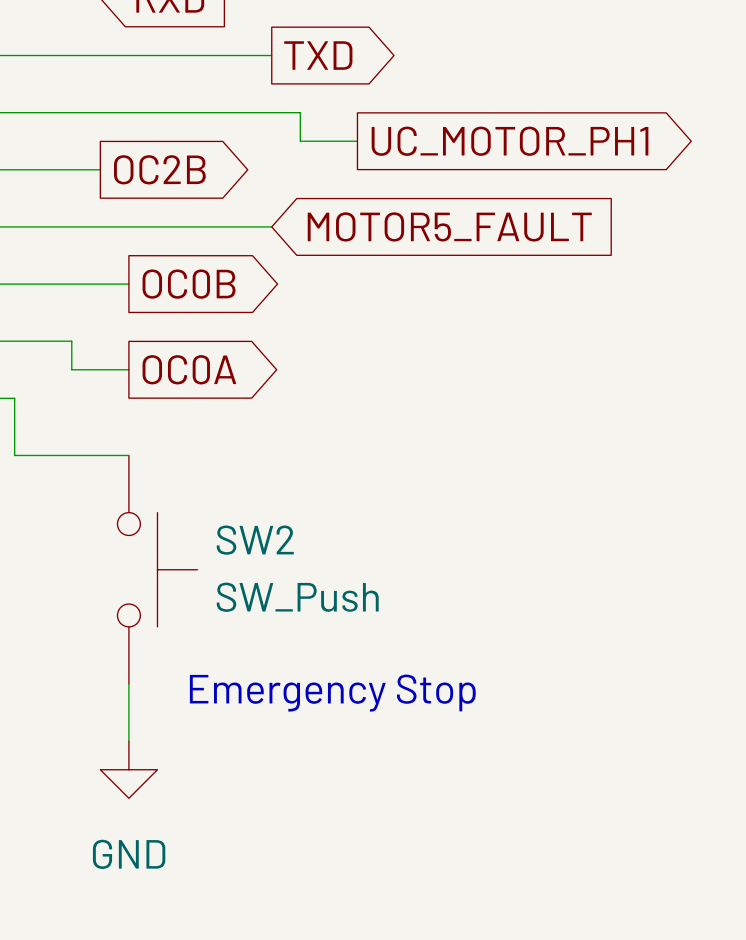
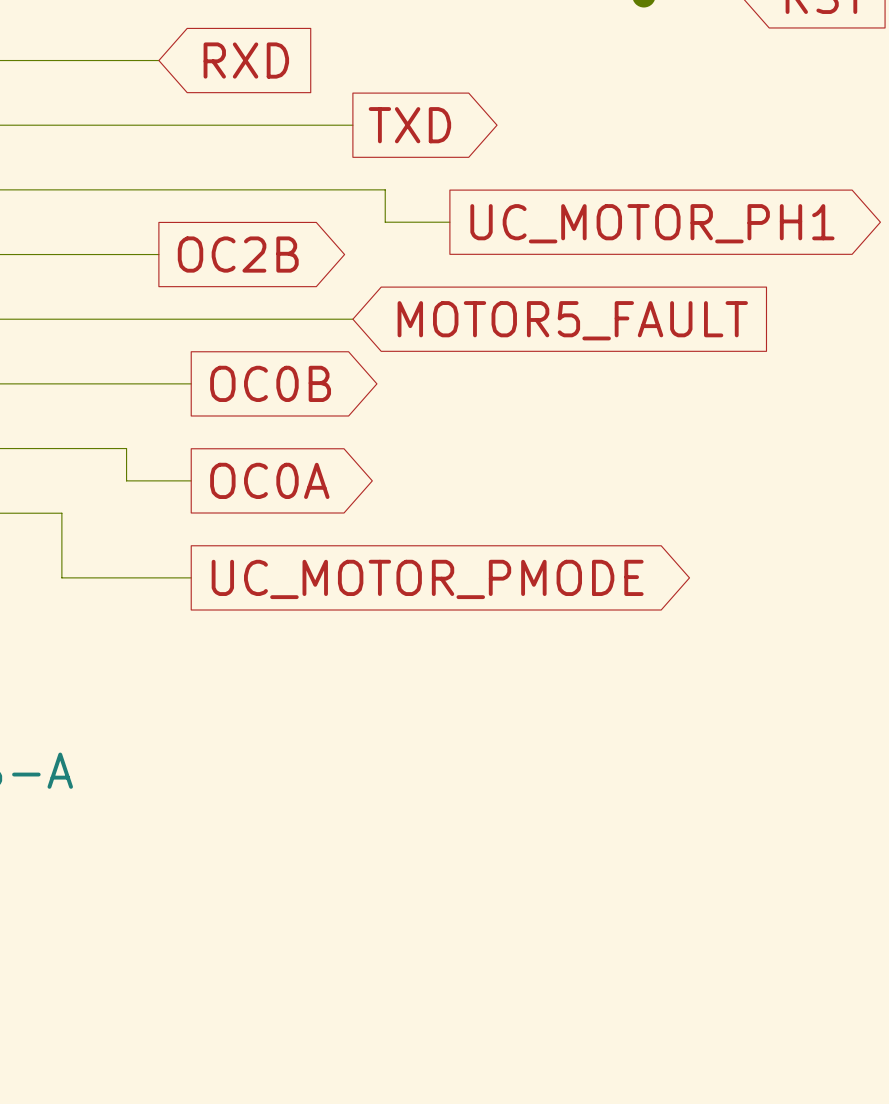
global label: none -> UC_MOTOR_PMODE (427, 579)
SW2: SW_Push (157, 569) -> none
wire: (128, 684) (128, 741) -> none
text: Emergency Stop (332, 693) -> none
power symbol: GND (128, 769) -> none

